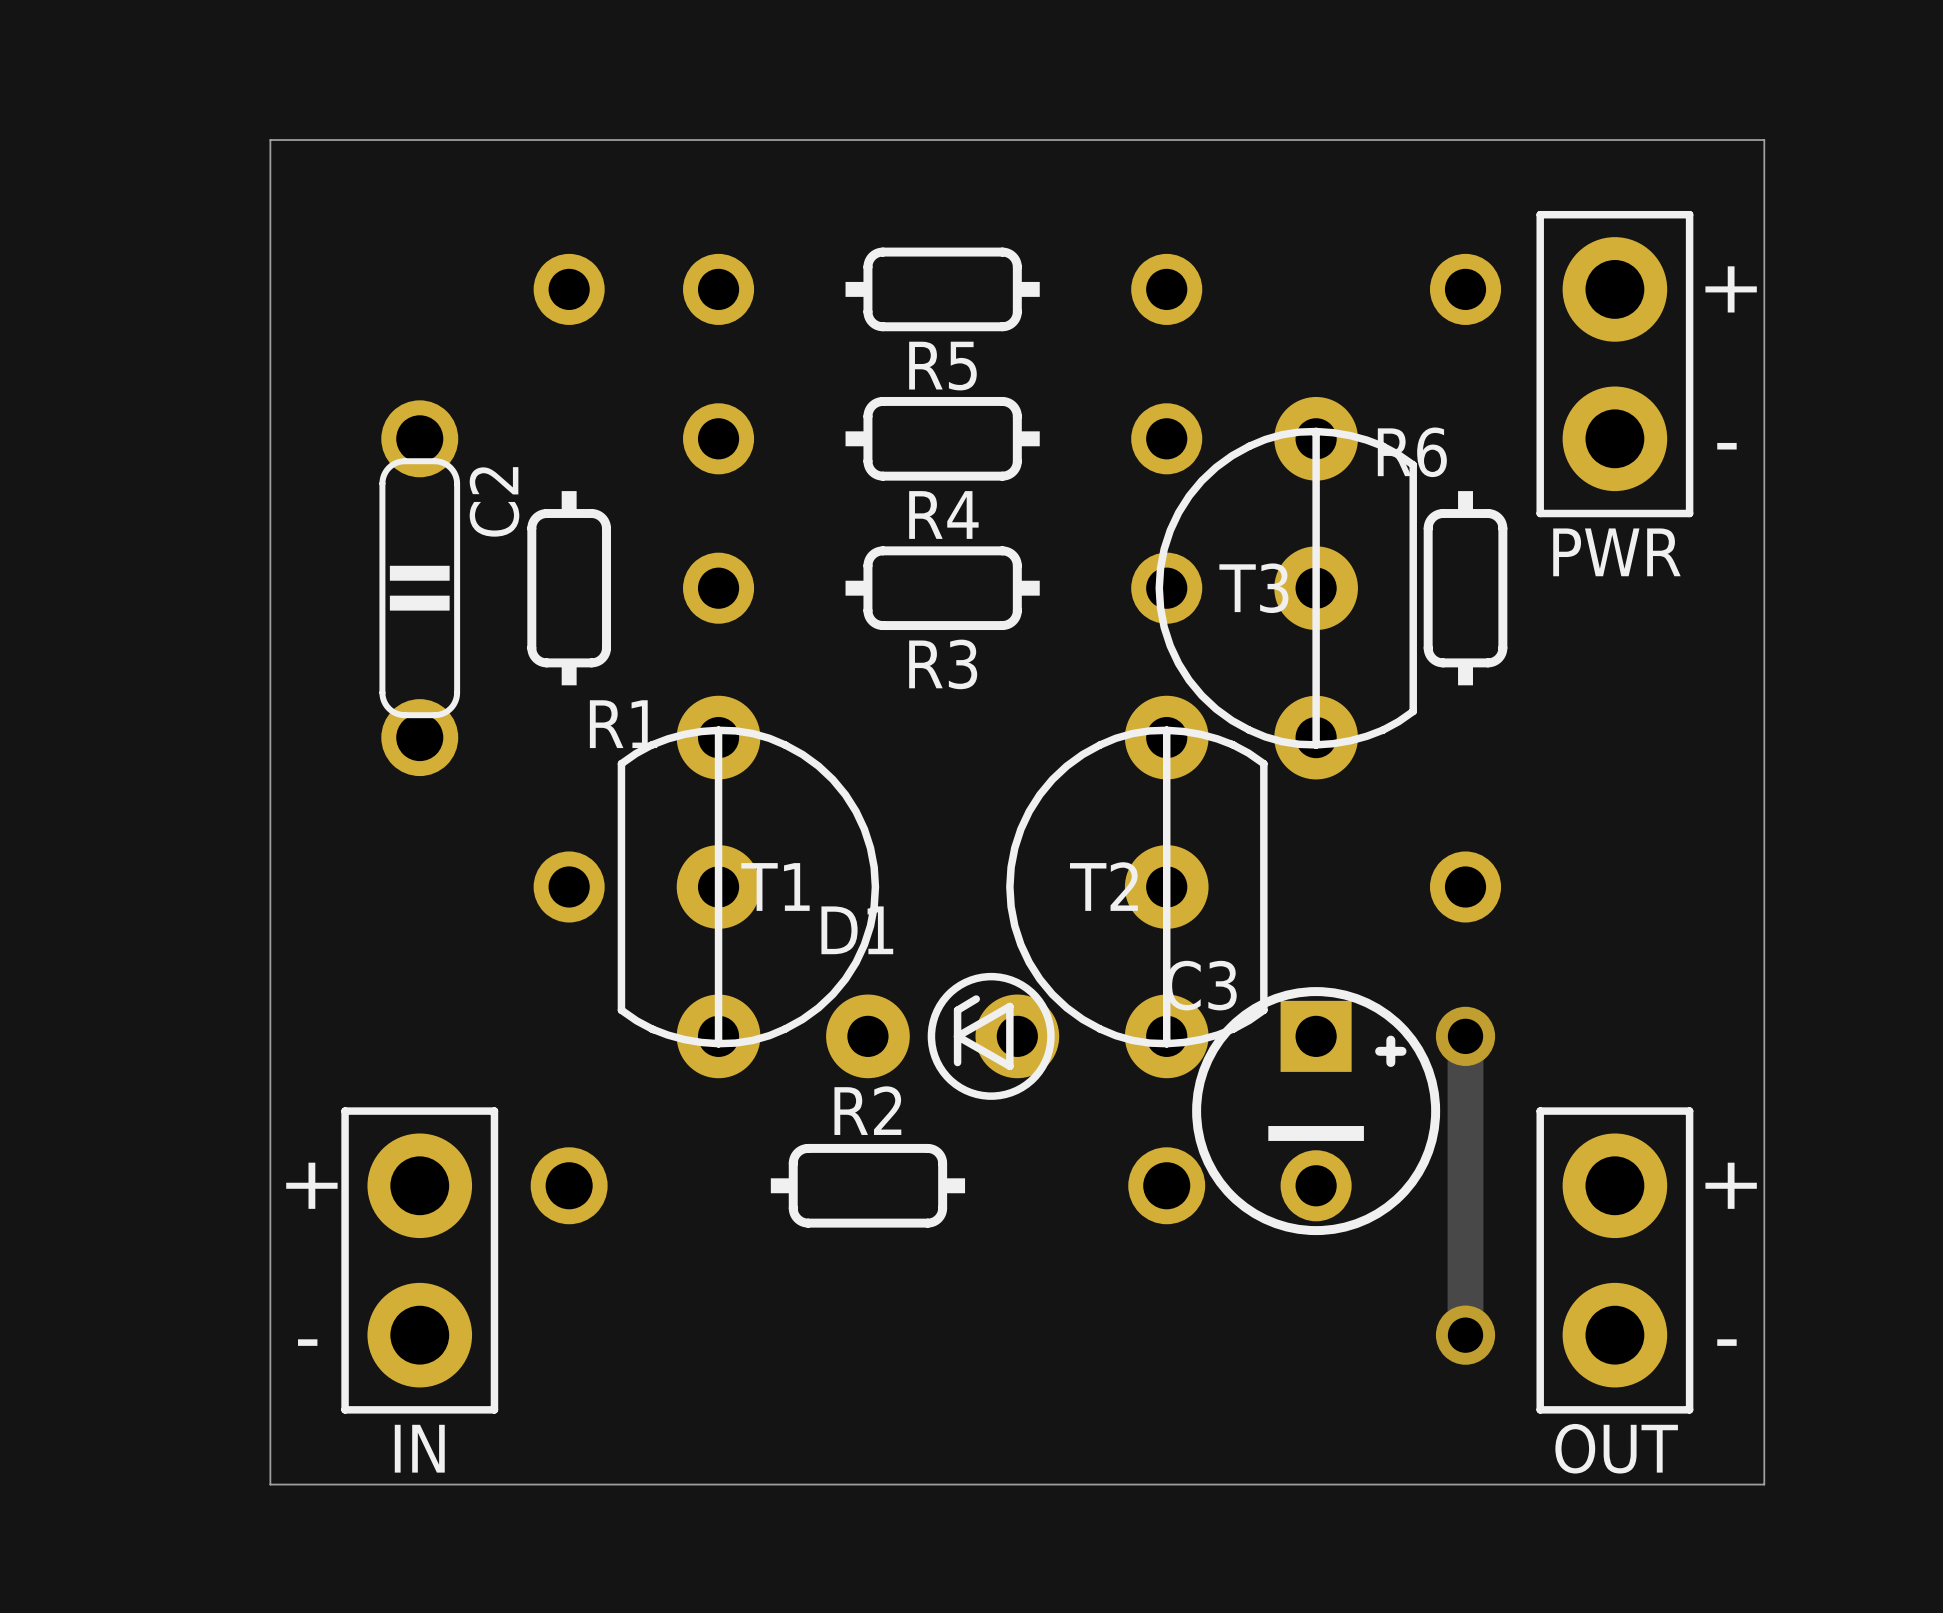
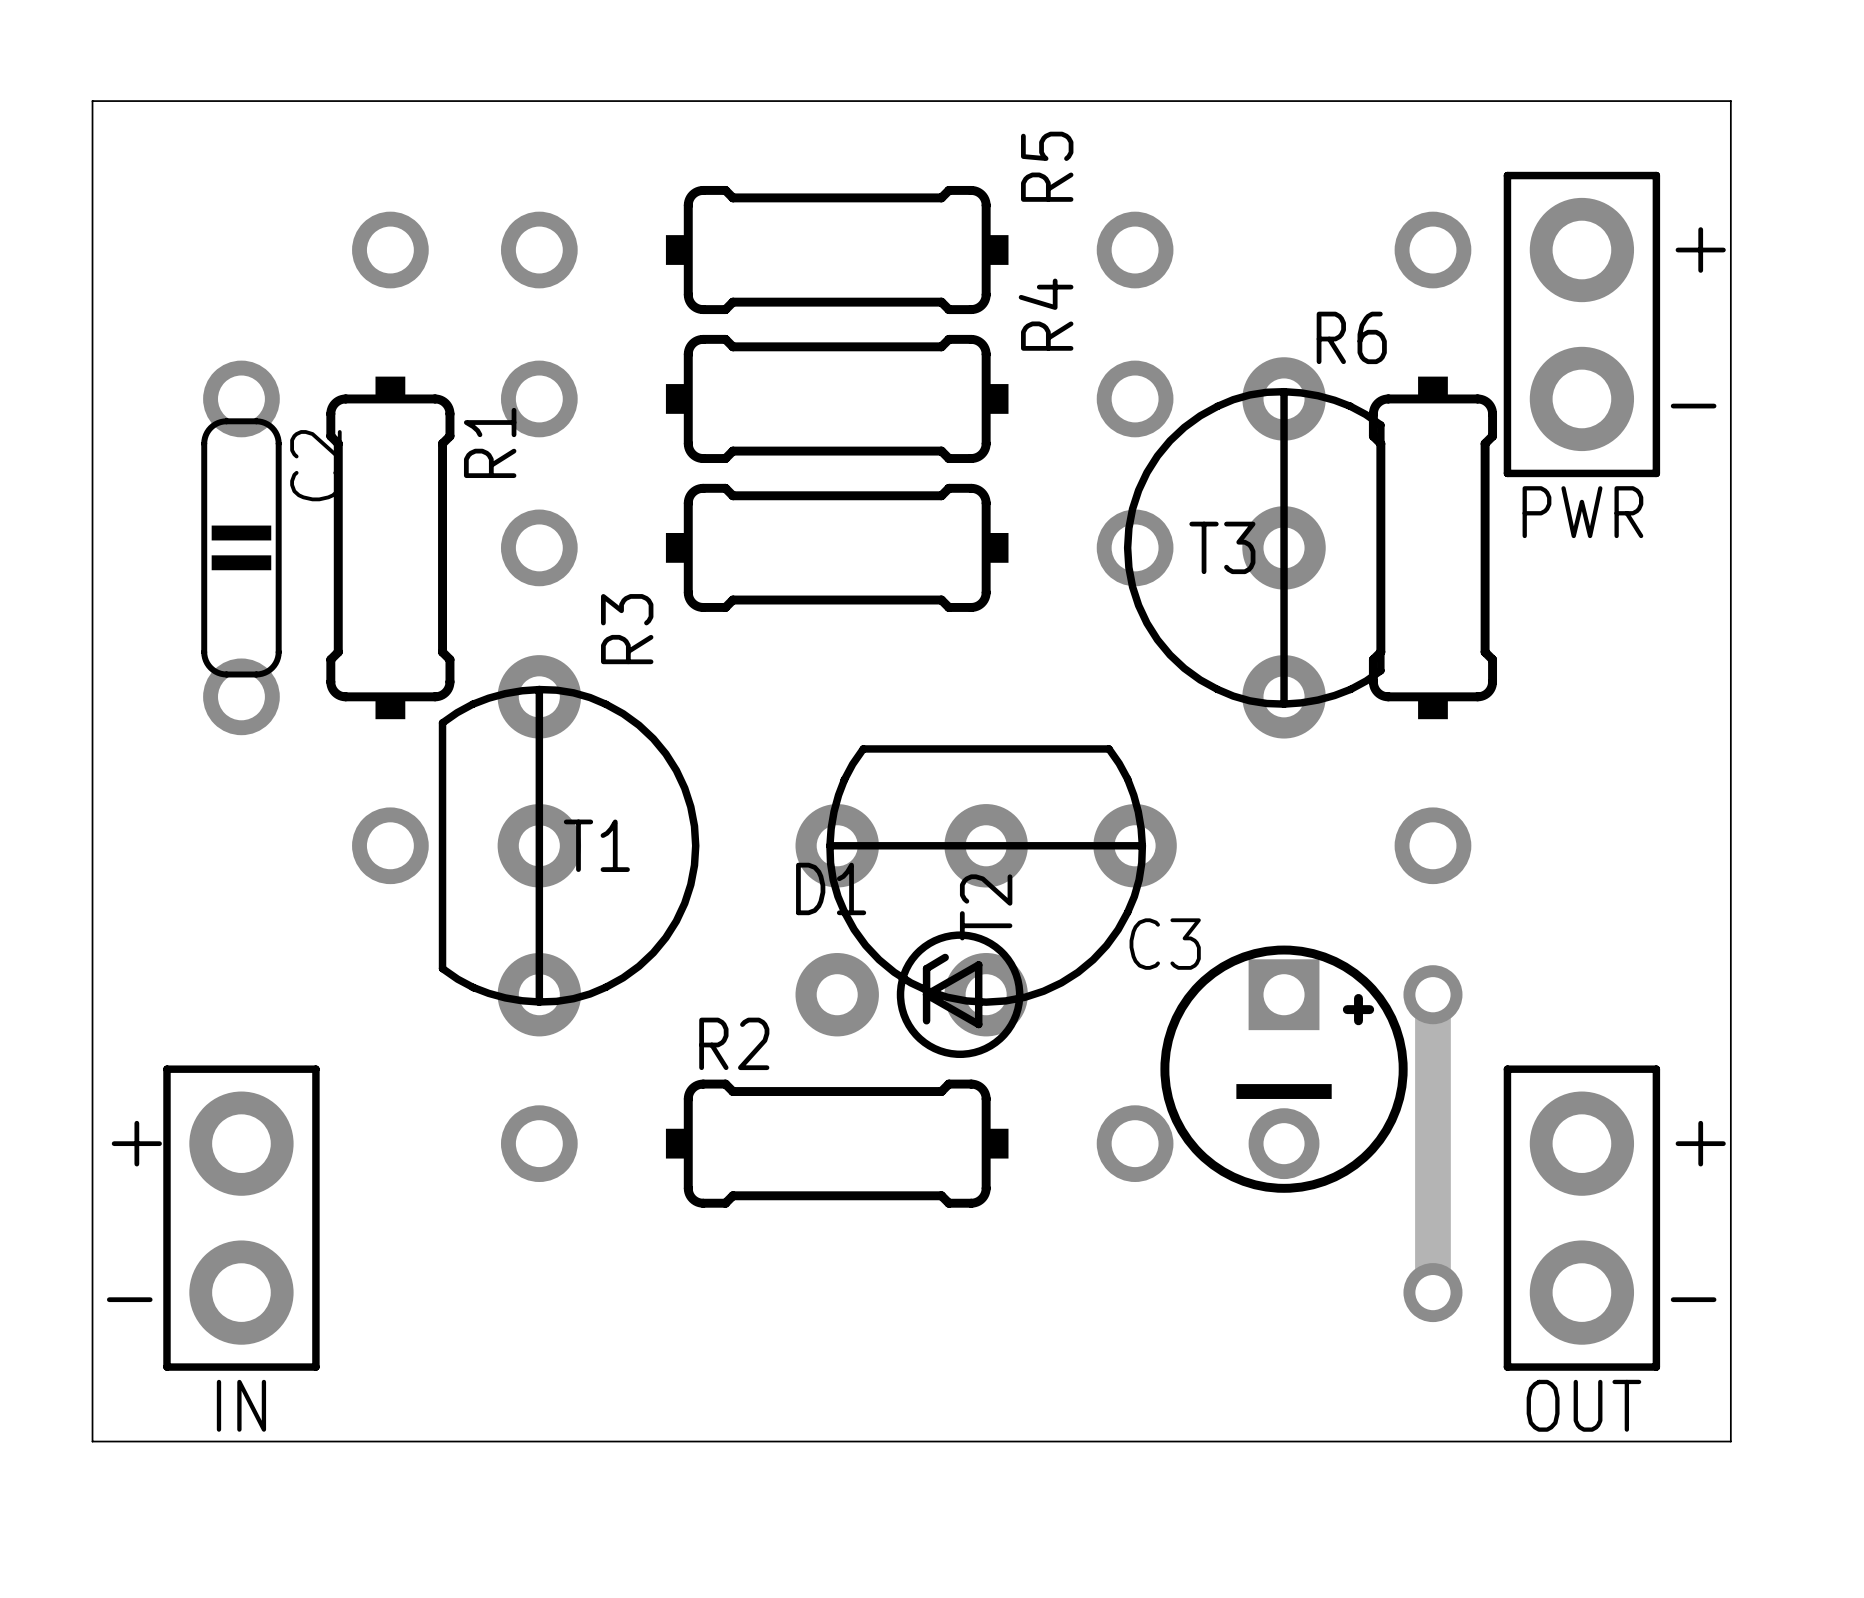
board edge: (270, 140) (270, 1484) -> (241, 101) (92, 101) (92, 1441) (241, 1441)
R5 footprint: [683, 247, 1203, 332] -> [500, 185, 1174, 315]
R1 footprint: [527, 253, 611, 923] -> [326, 211, 455, 885]
R6 footprint: [1423, 253, 1508, 923] -> [1368, 211, 1498, 885]
R5 name position: R5 (942, 366) -> R5 (1047, 166)
R4 footprint: [683, 396, 1203, 481] -> [500, 334, 1174, 464]
R4 name position: R4 (943, 515) -> R4 (1046, 314)
R3 footprint: [683, 546, 1203, 631] -> [500, 483, 1174, 612]
C2 position: (419, 588) -> (241, 547)
R3 name position: R3 (943, 664) -> R3 (627, 629)
R1 name position: R1 (623, 724) -> R1 (490, 442)
T1 position: (748, 886) -> (569, 845)
T2 rotation: 0° (1136, 886) -> 90° counterclockwise (986, 875)
R2 footprint: [530, 1143, 1206, 1228] -> [500, 1079, 1174, 1208]
IN position: (419, 1260) -> (241, 1218)

